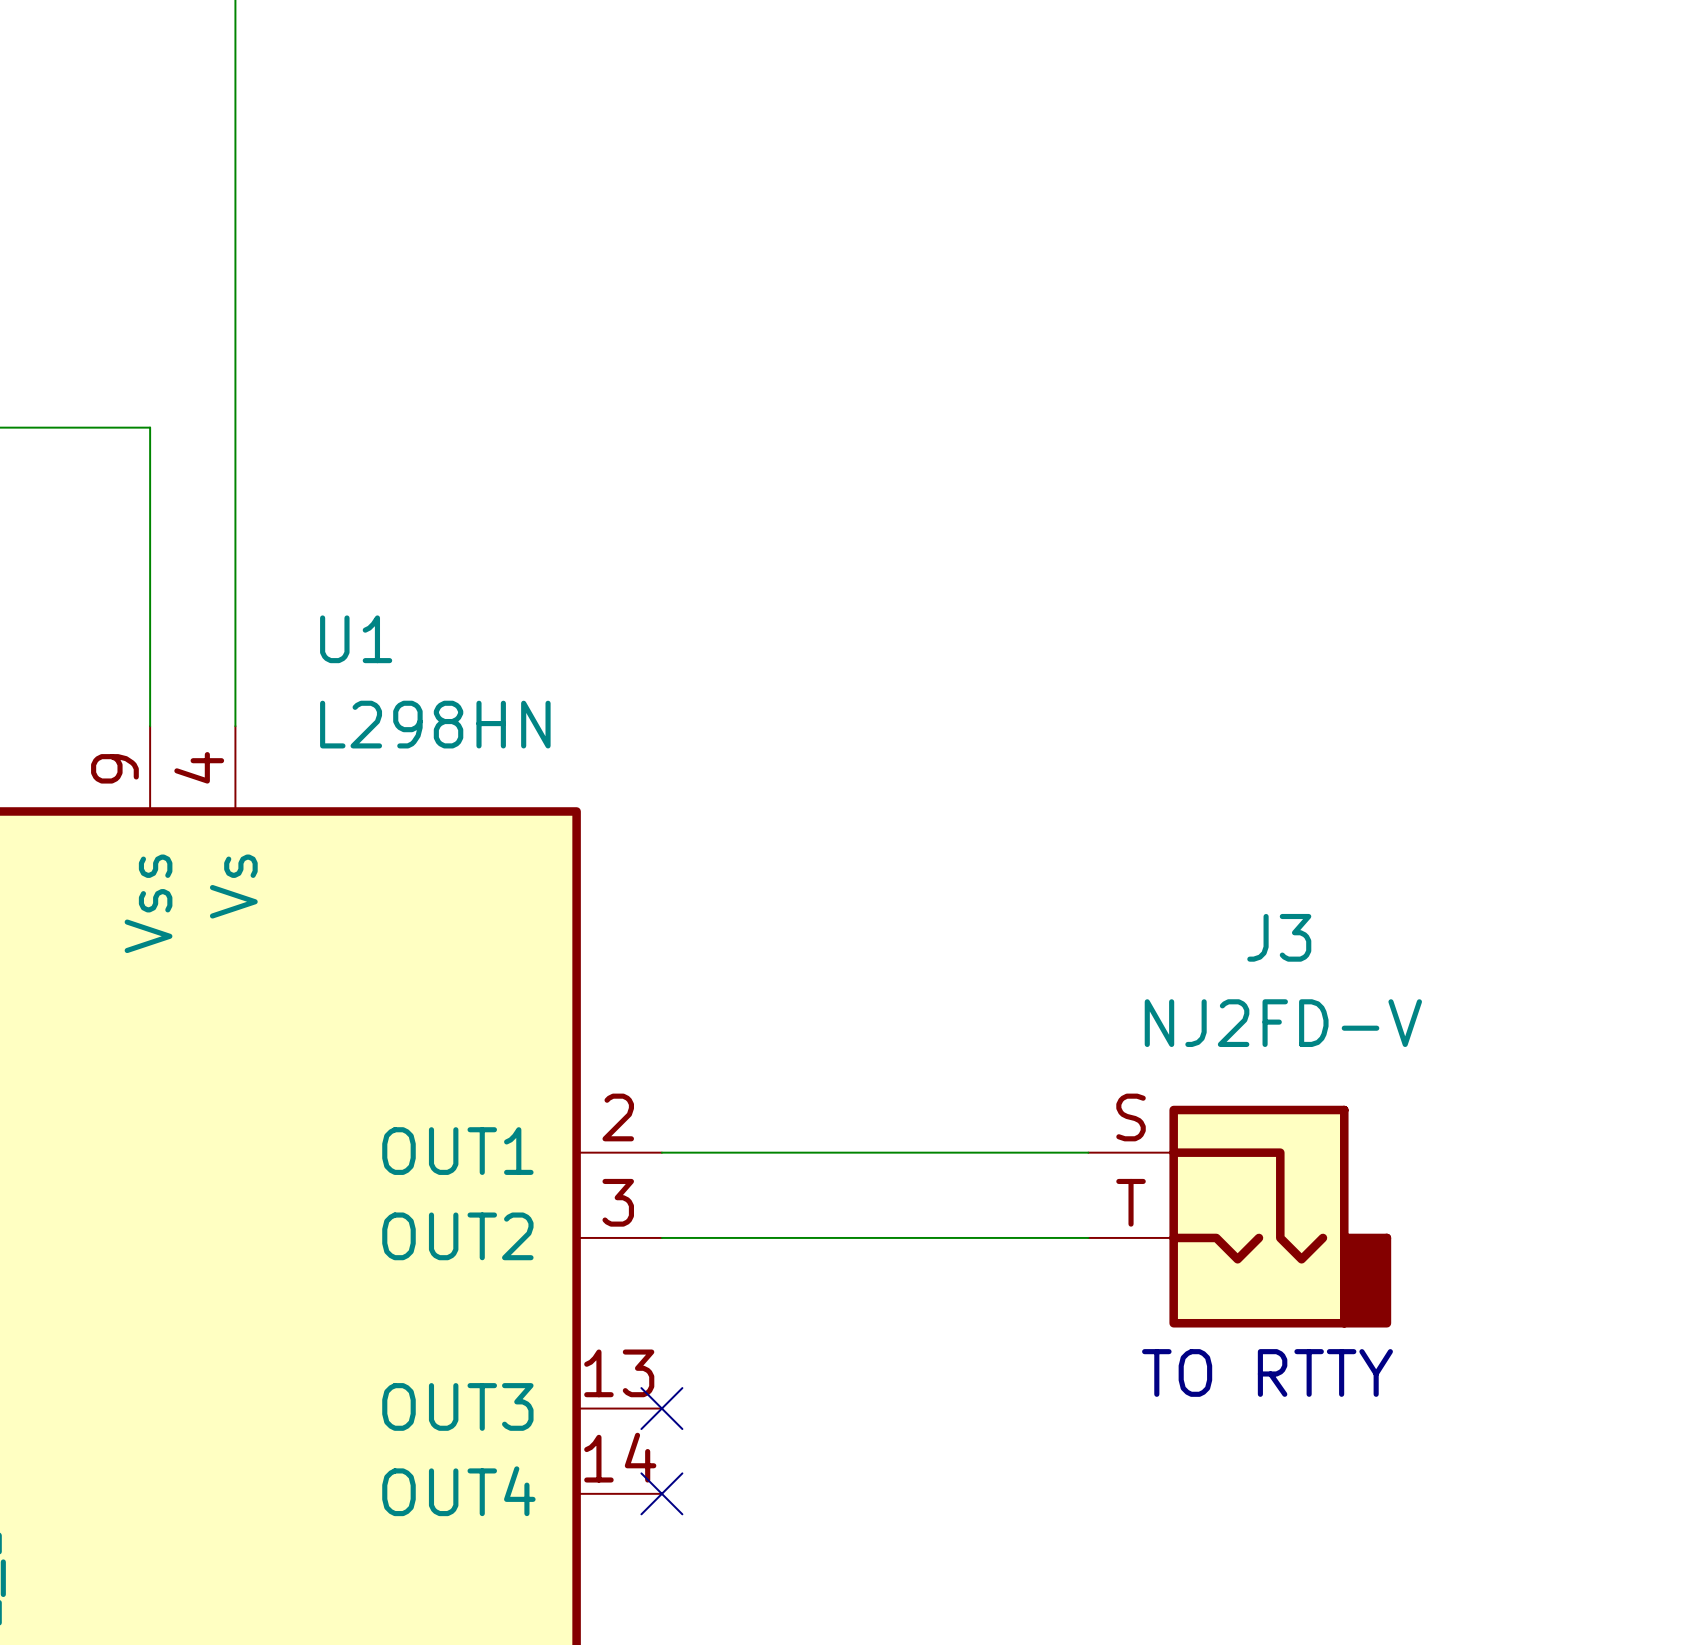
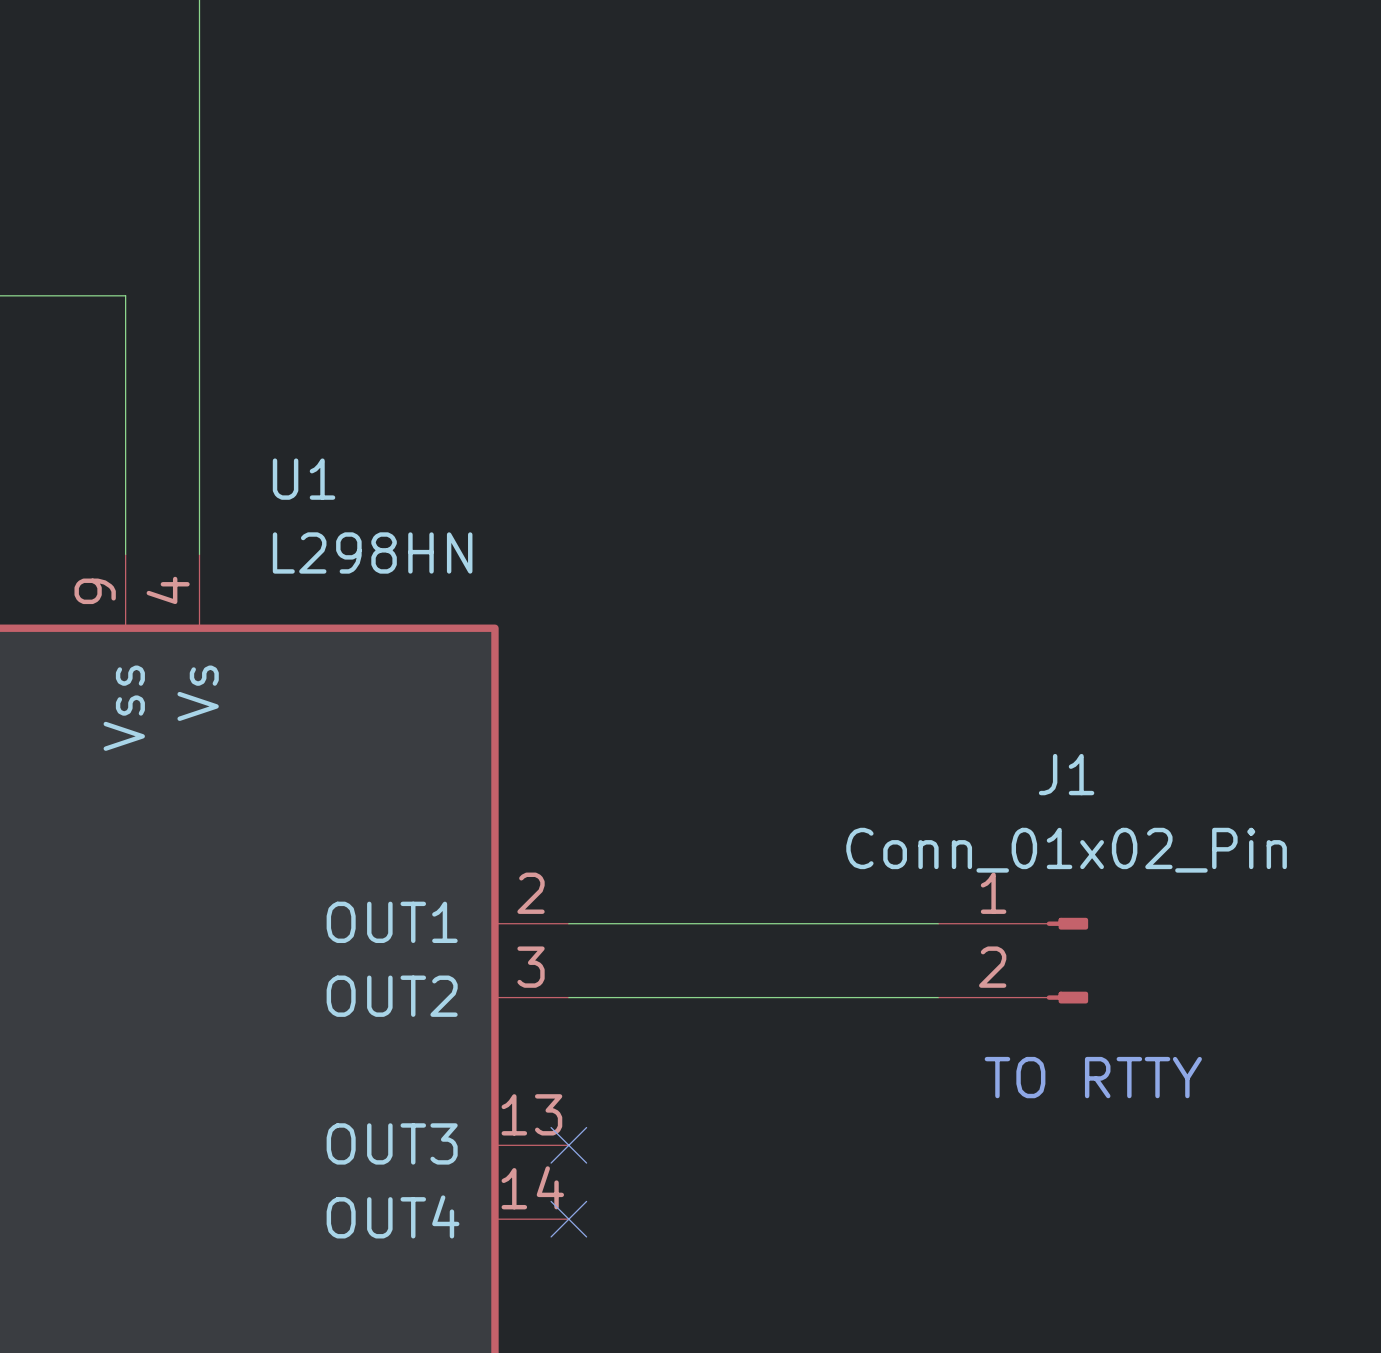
J1: none -> Conn_01x02_Pin (1013, 960)
J3: NJ2FD-V (1239, 1216) -> none
text position: TO RTTY (1267, 1372) -> TO RTTY (1093, 1077)

